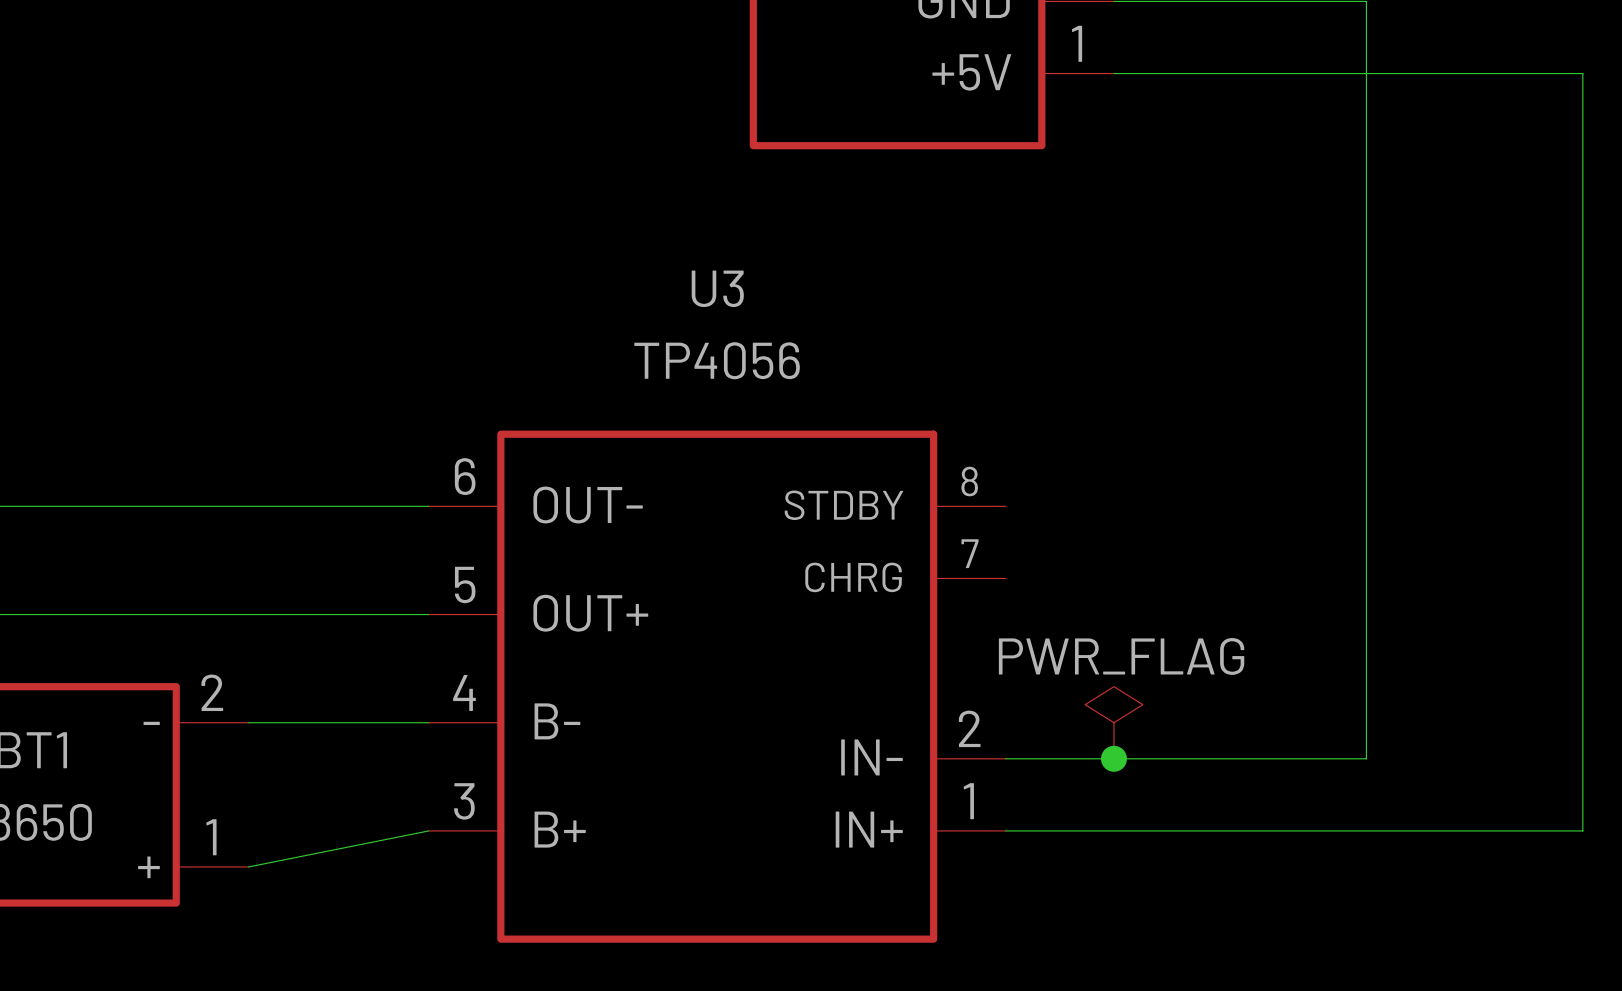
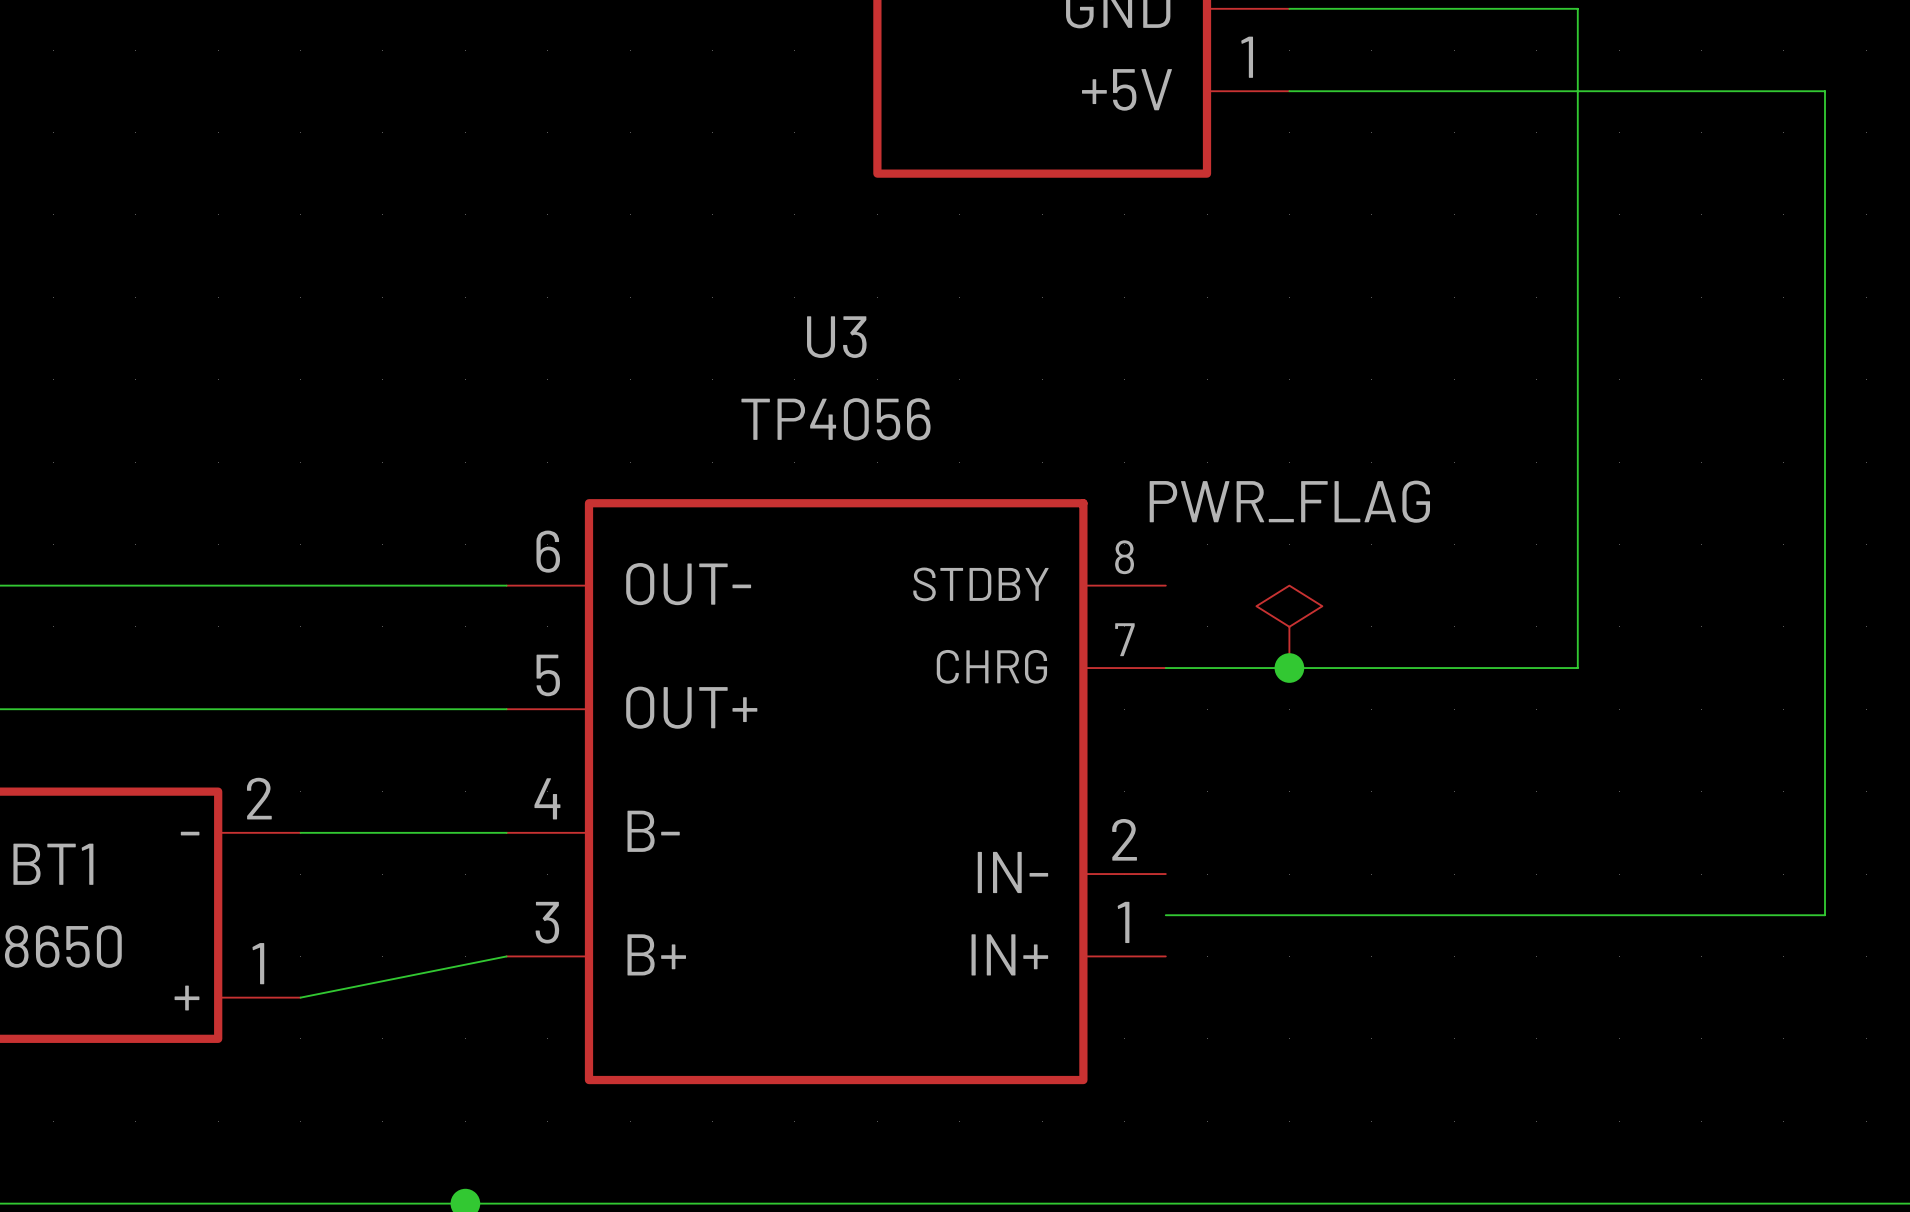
junction: none -> (1289, 668)
wire: (1366, 578) (1366, 758) (1005, 758) -> (1577, 668) (1165, 668)
power symbol text position: PWR_FLAG (1121, 656) -> PWR_FLAG (1289, 501)
power symbol position: PWR_FLAG (1113, 722) -> PWR_FLAG (1289, 626)
junction: (1113, 758) -> none
wire: (1582, 794) (1582, 830) (1005, 830) -> (1825, 915) (1165, 915)

